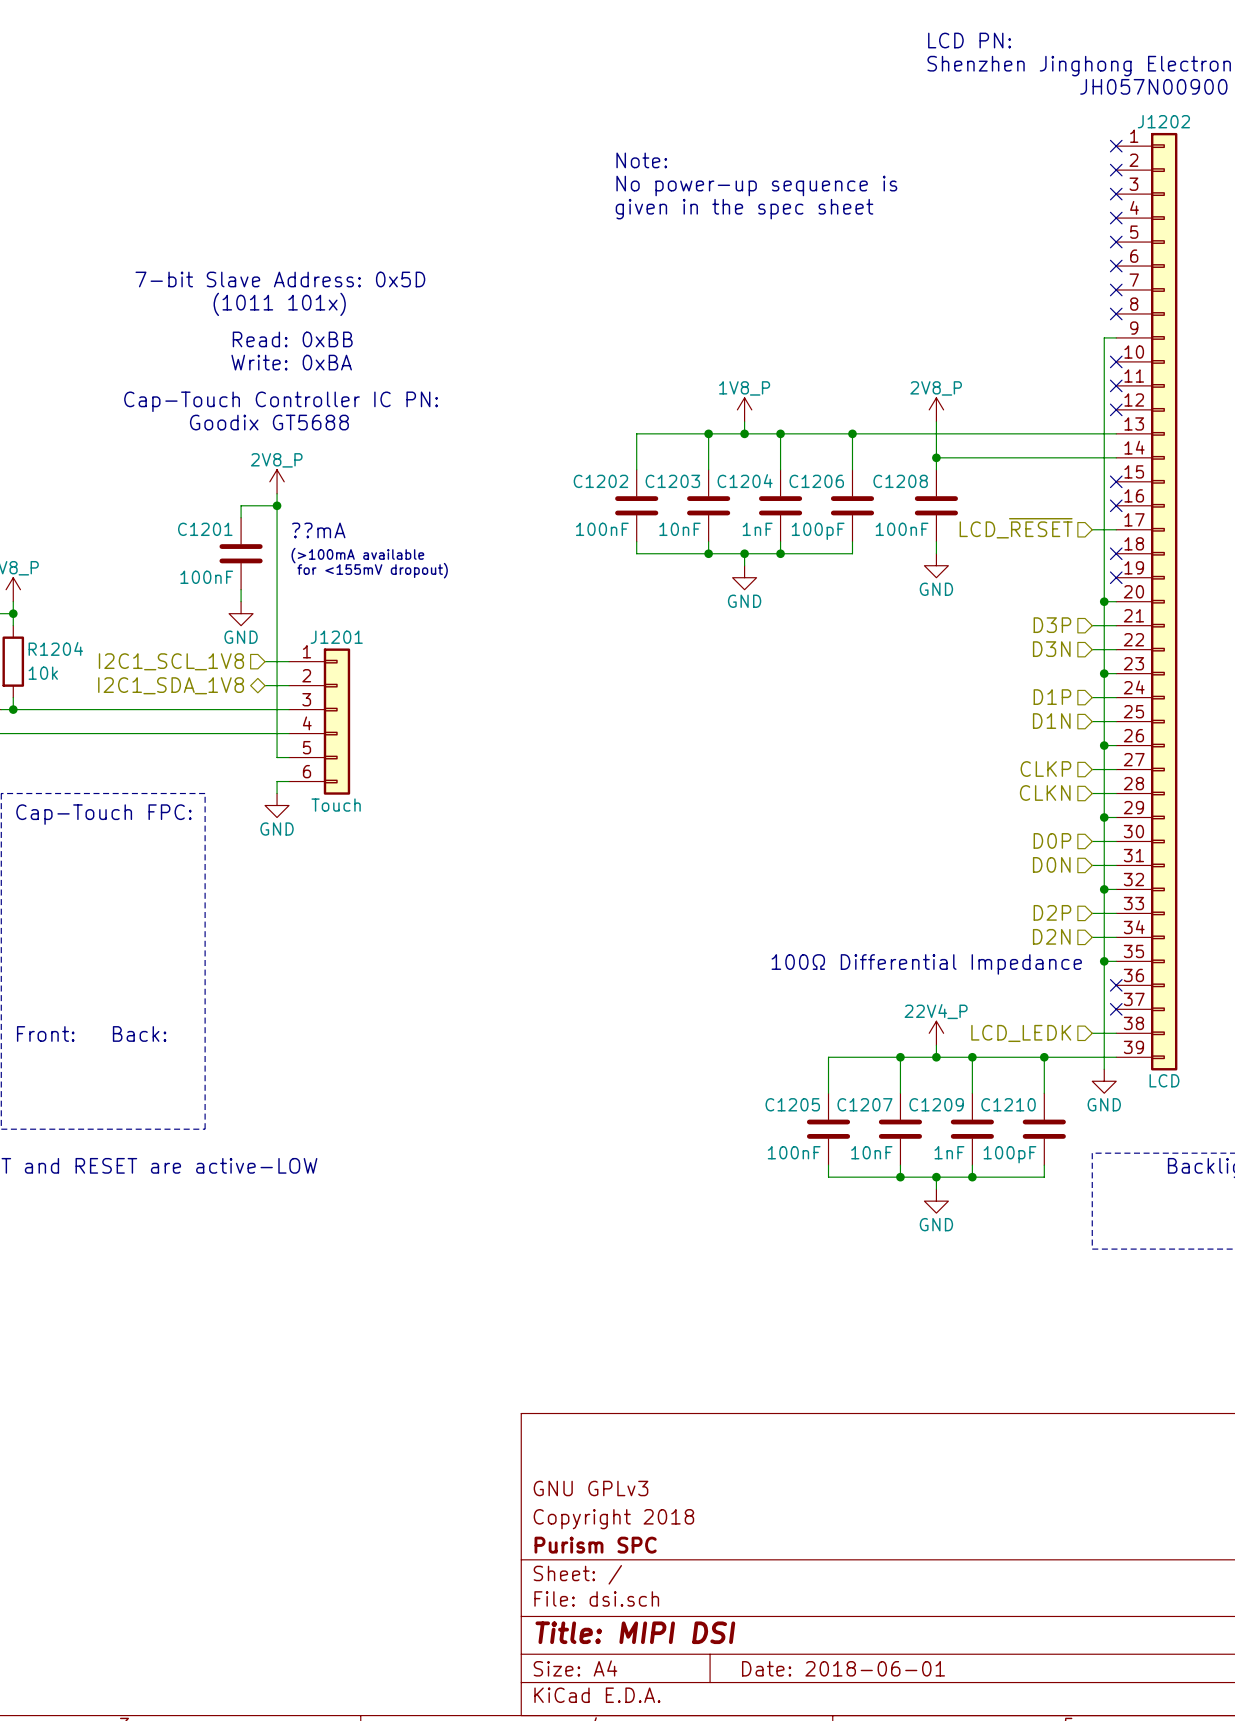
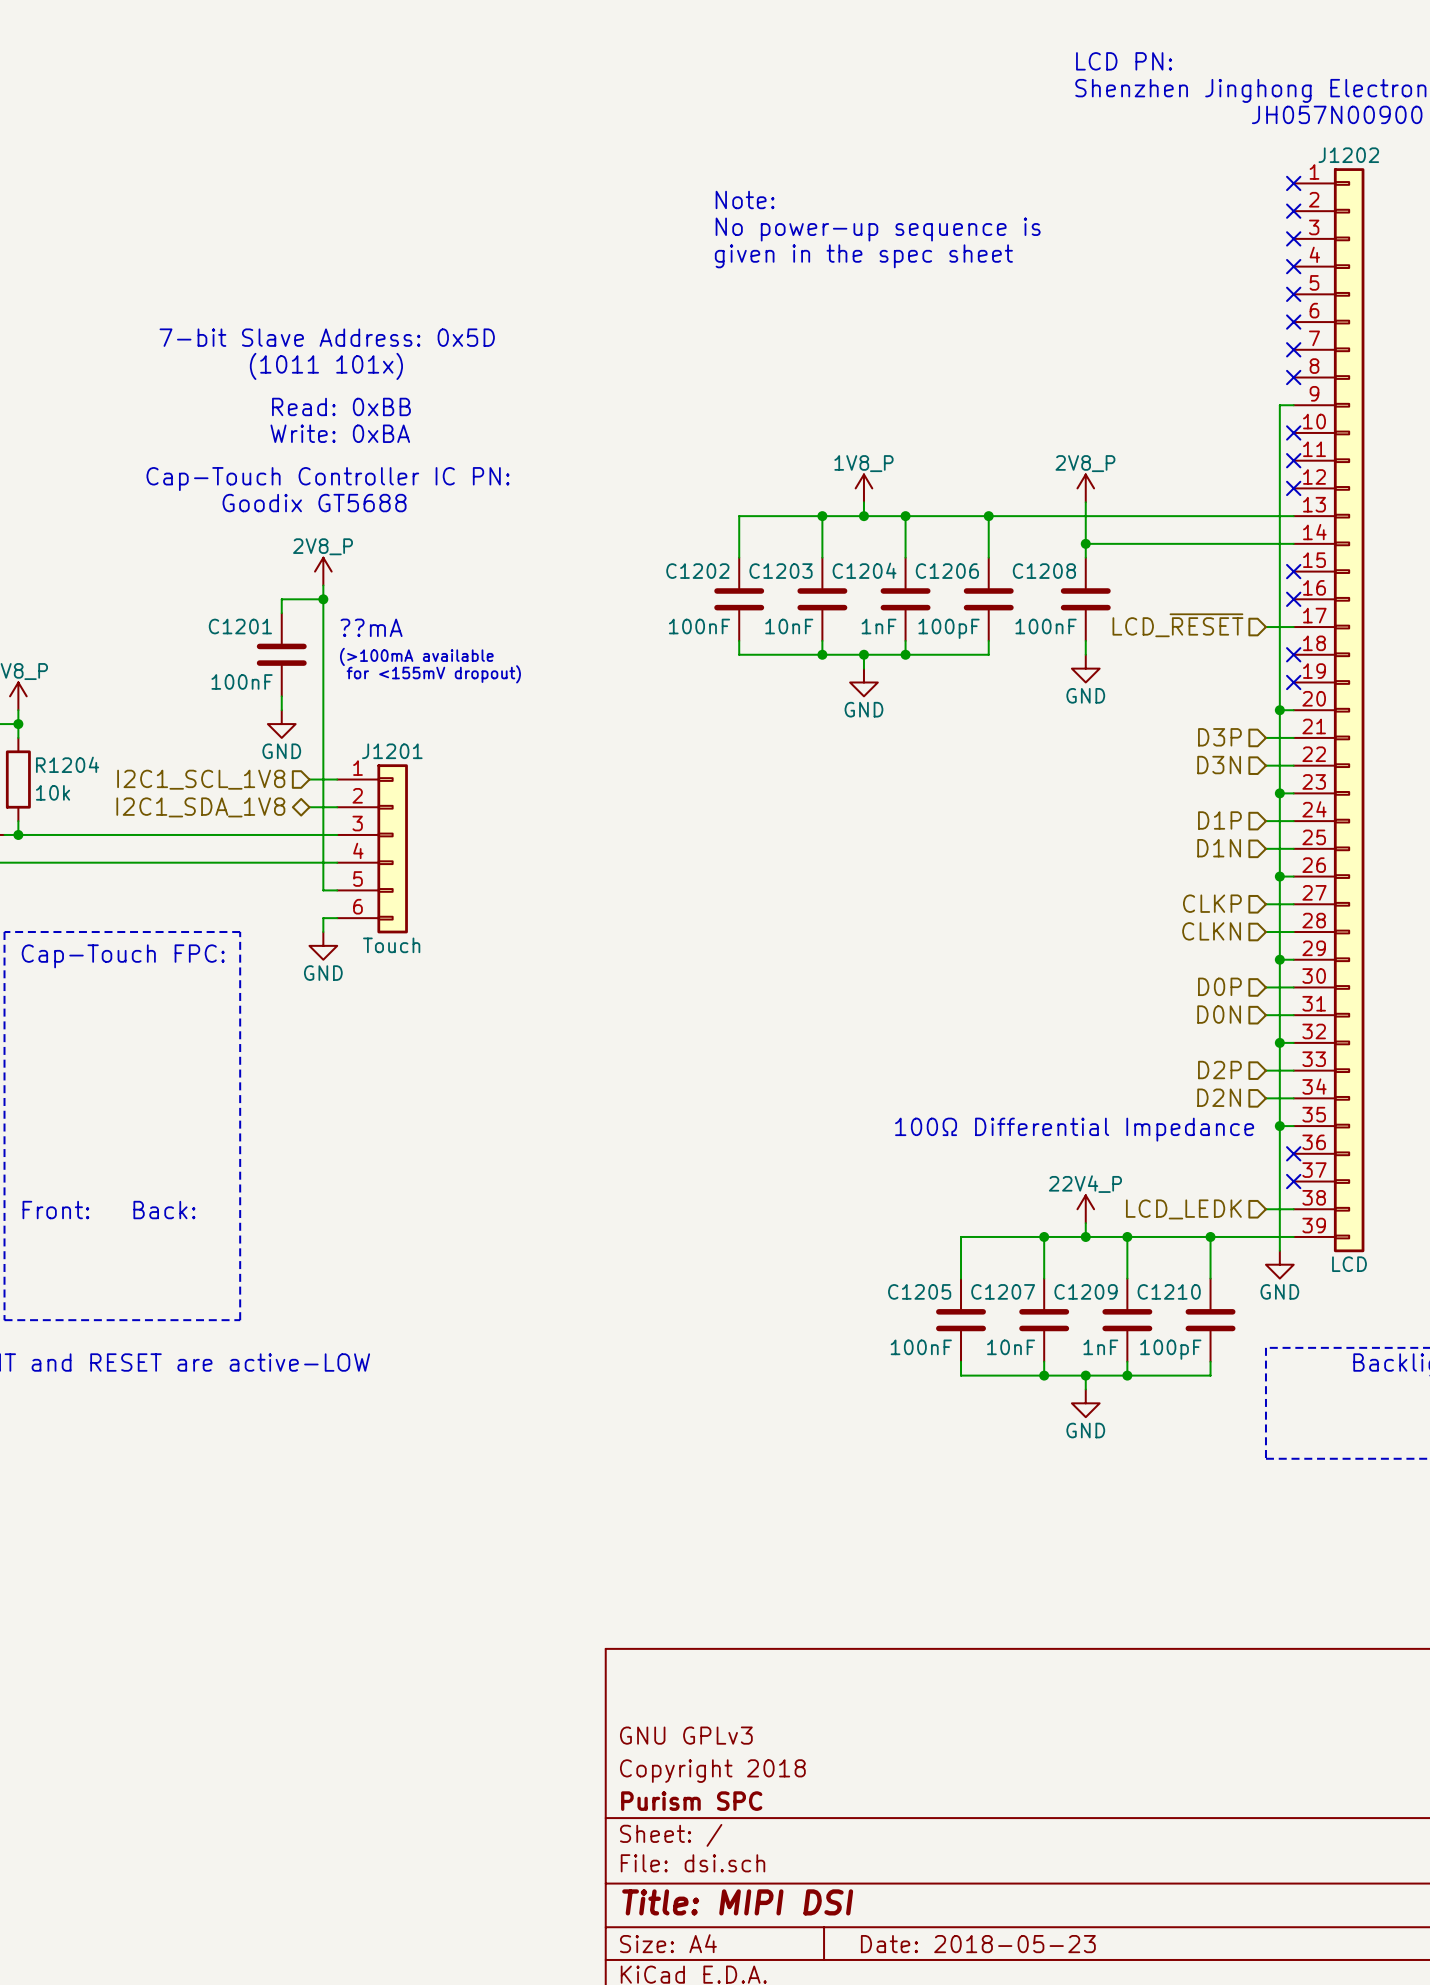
title block: Date: 2018-06-01 (843, 1668) -> Date: 2018-05-23 (978, 1944)

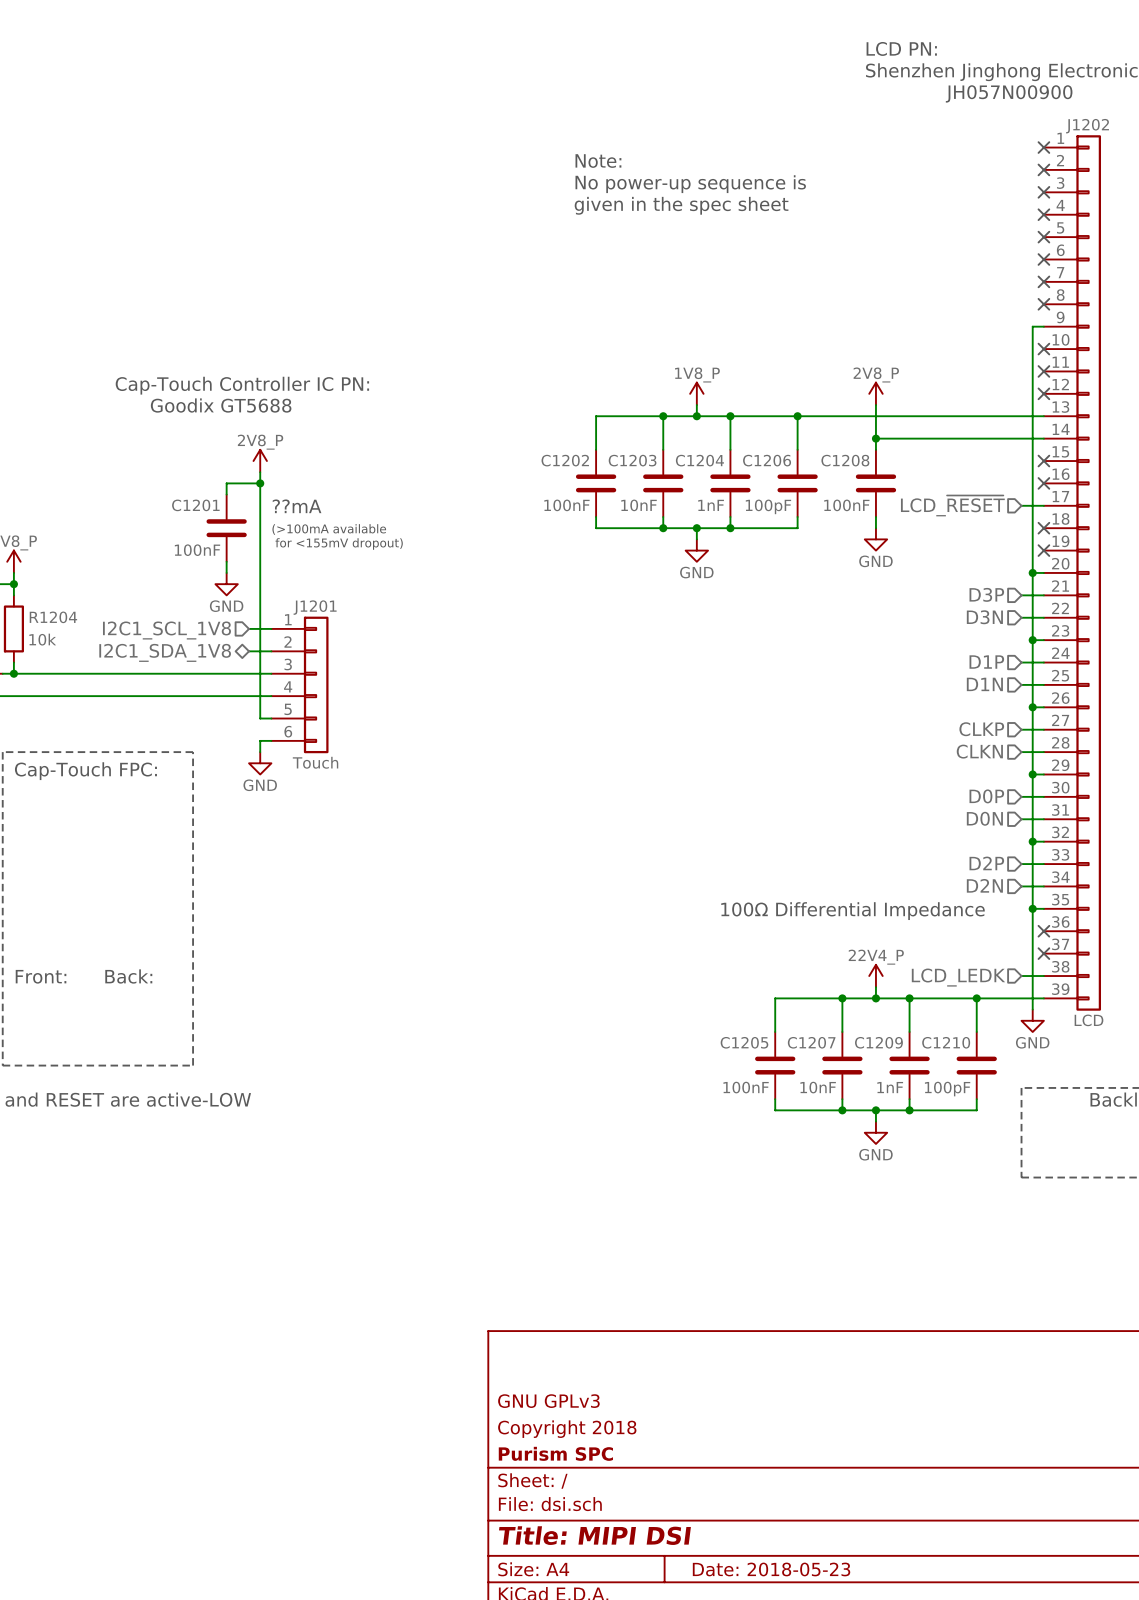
text: 7-bit Slave Address: 0x5D (327, 337) -> none
text: (1011 101x) (326, 366) -> none
text: Read: 0xBB (341, 406) -> none
text: Write: 0xBA (340, 433) -> none

